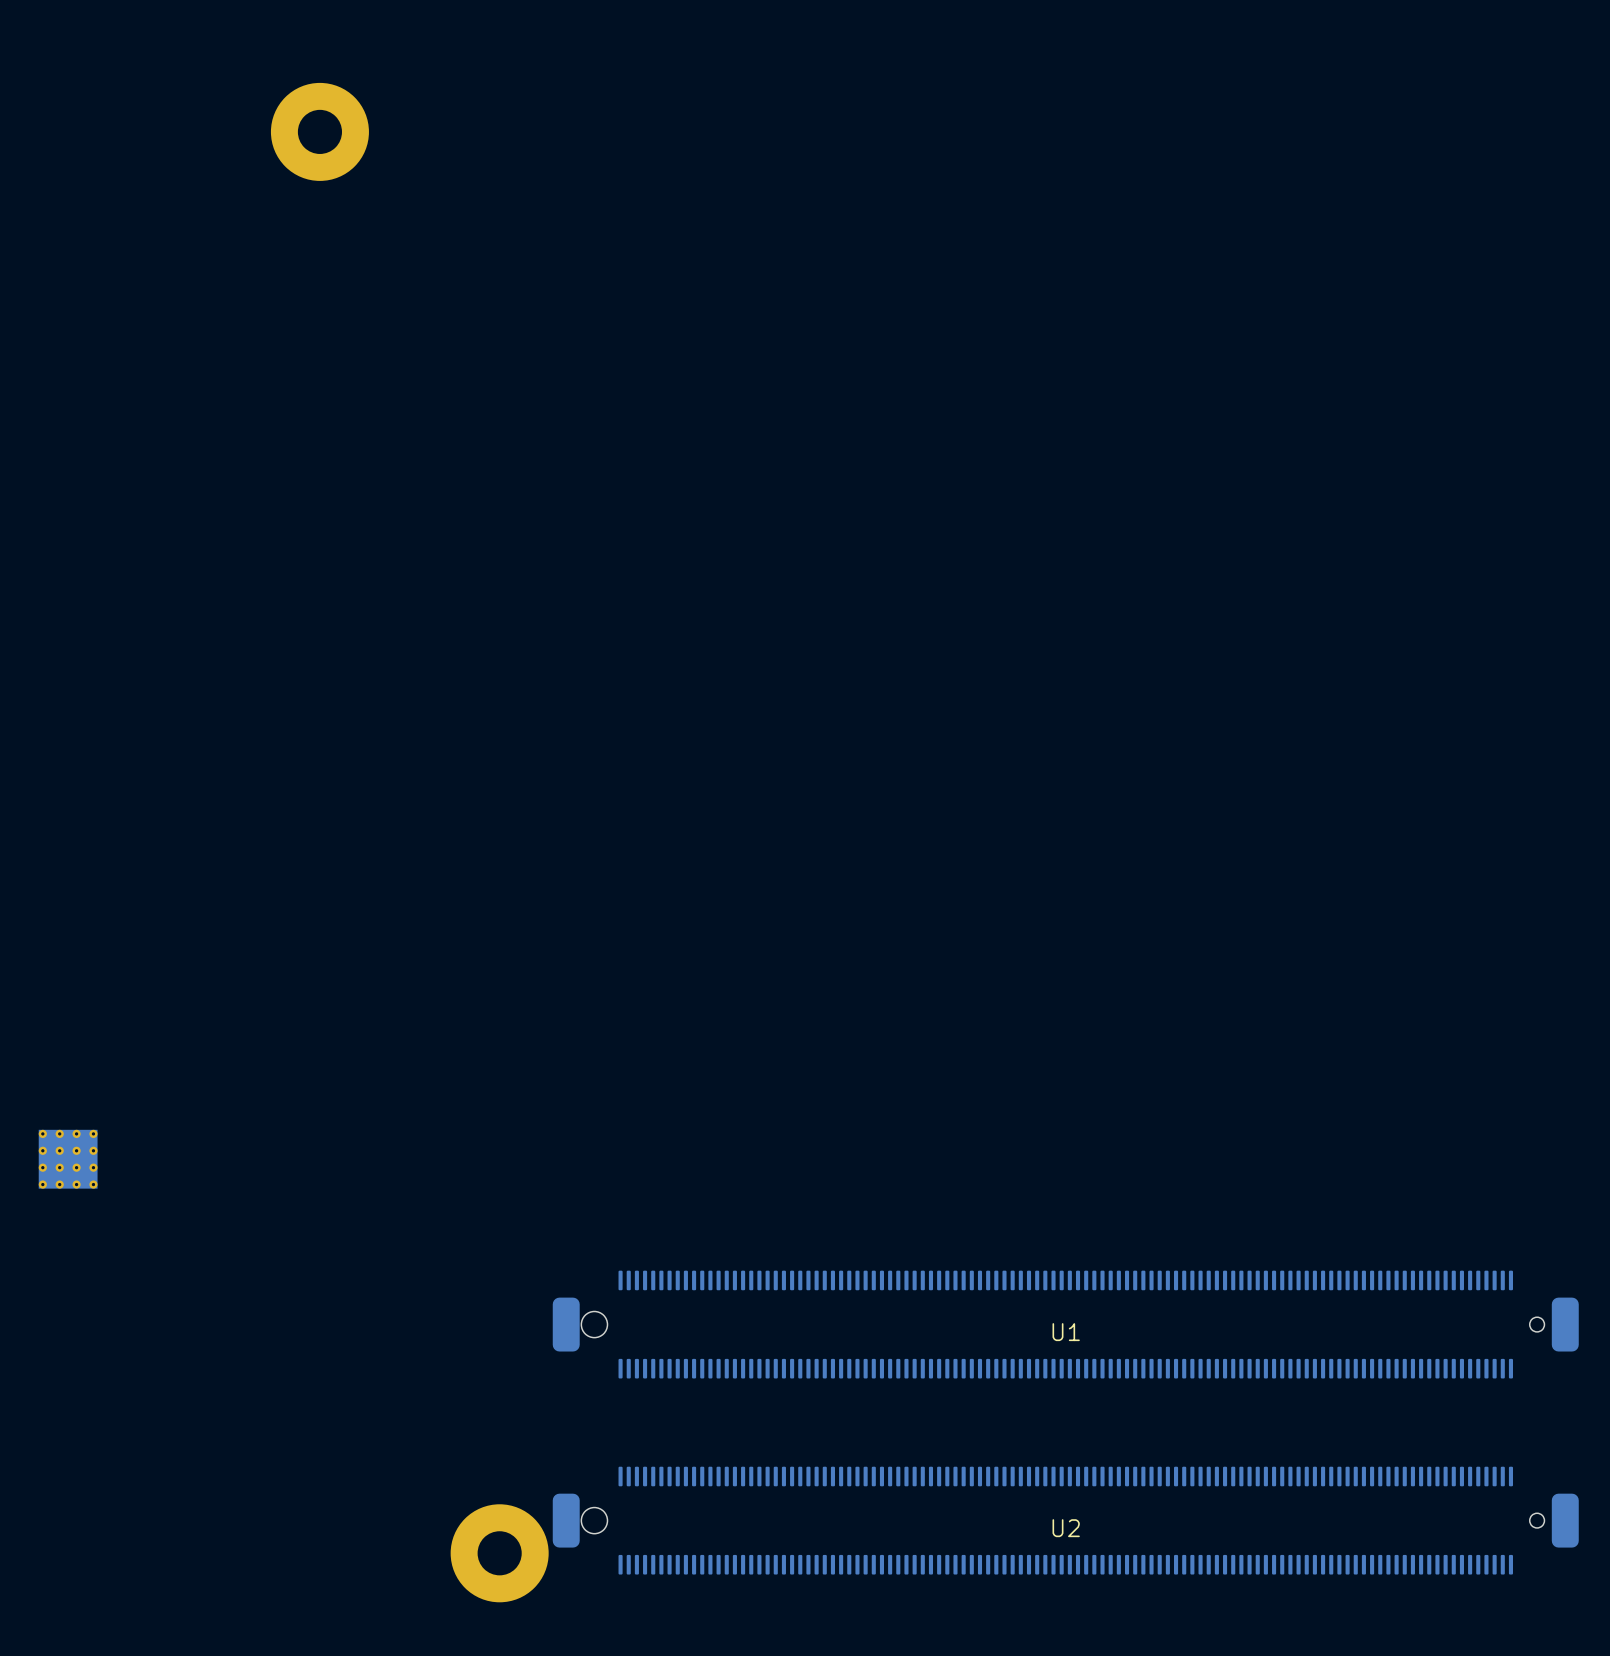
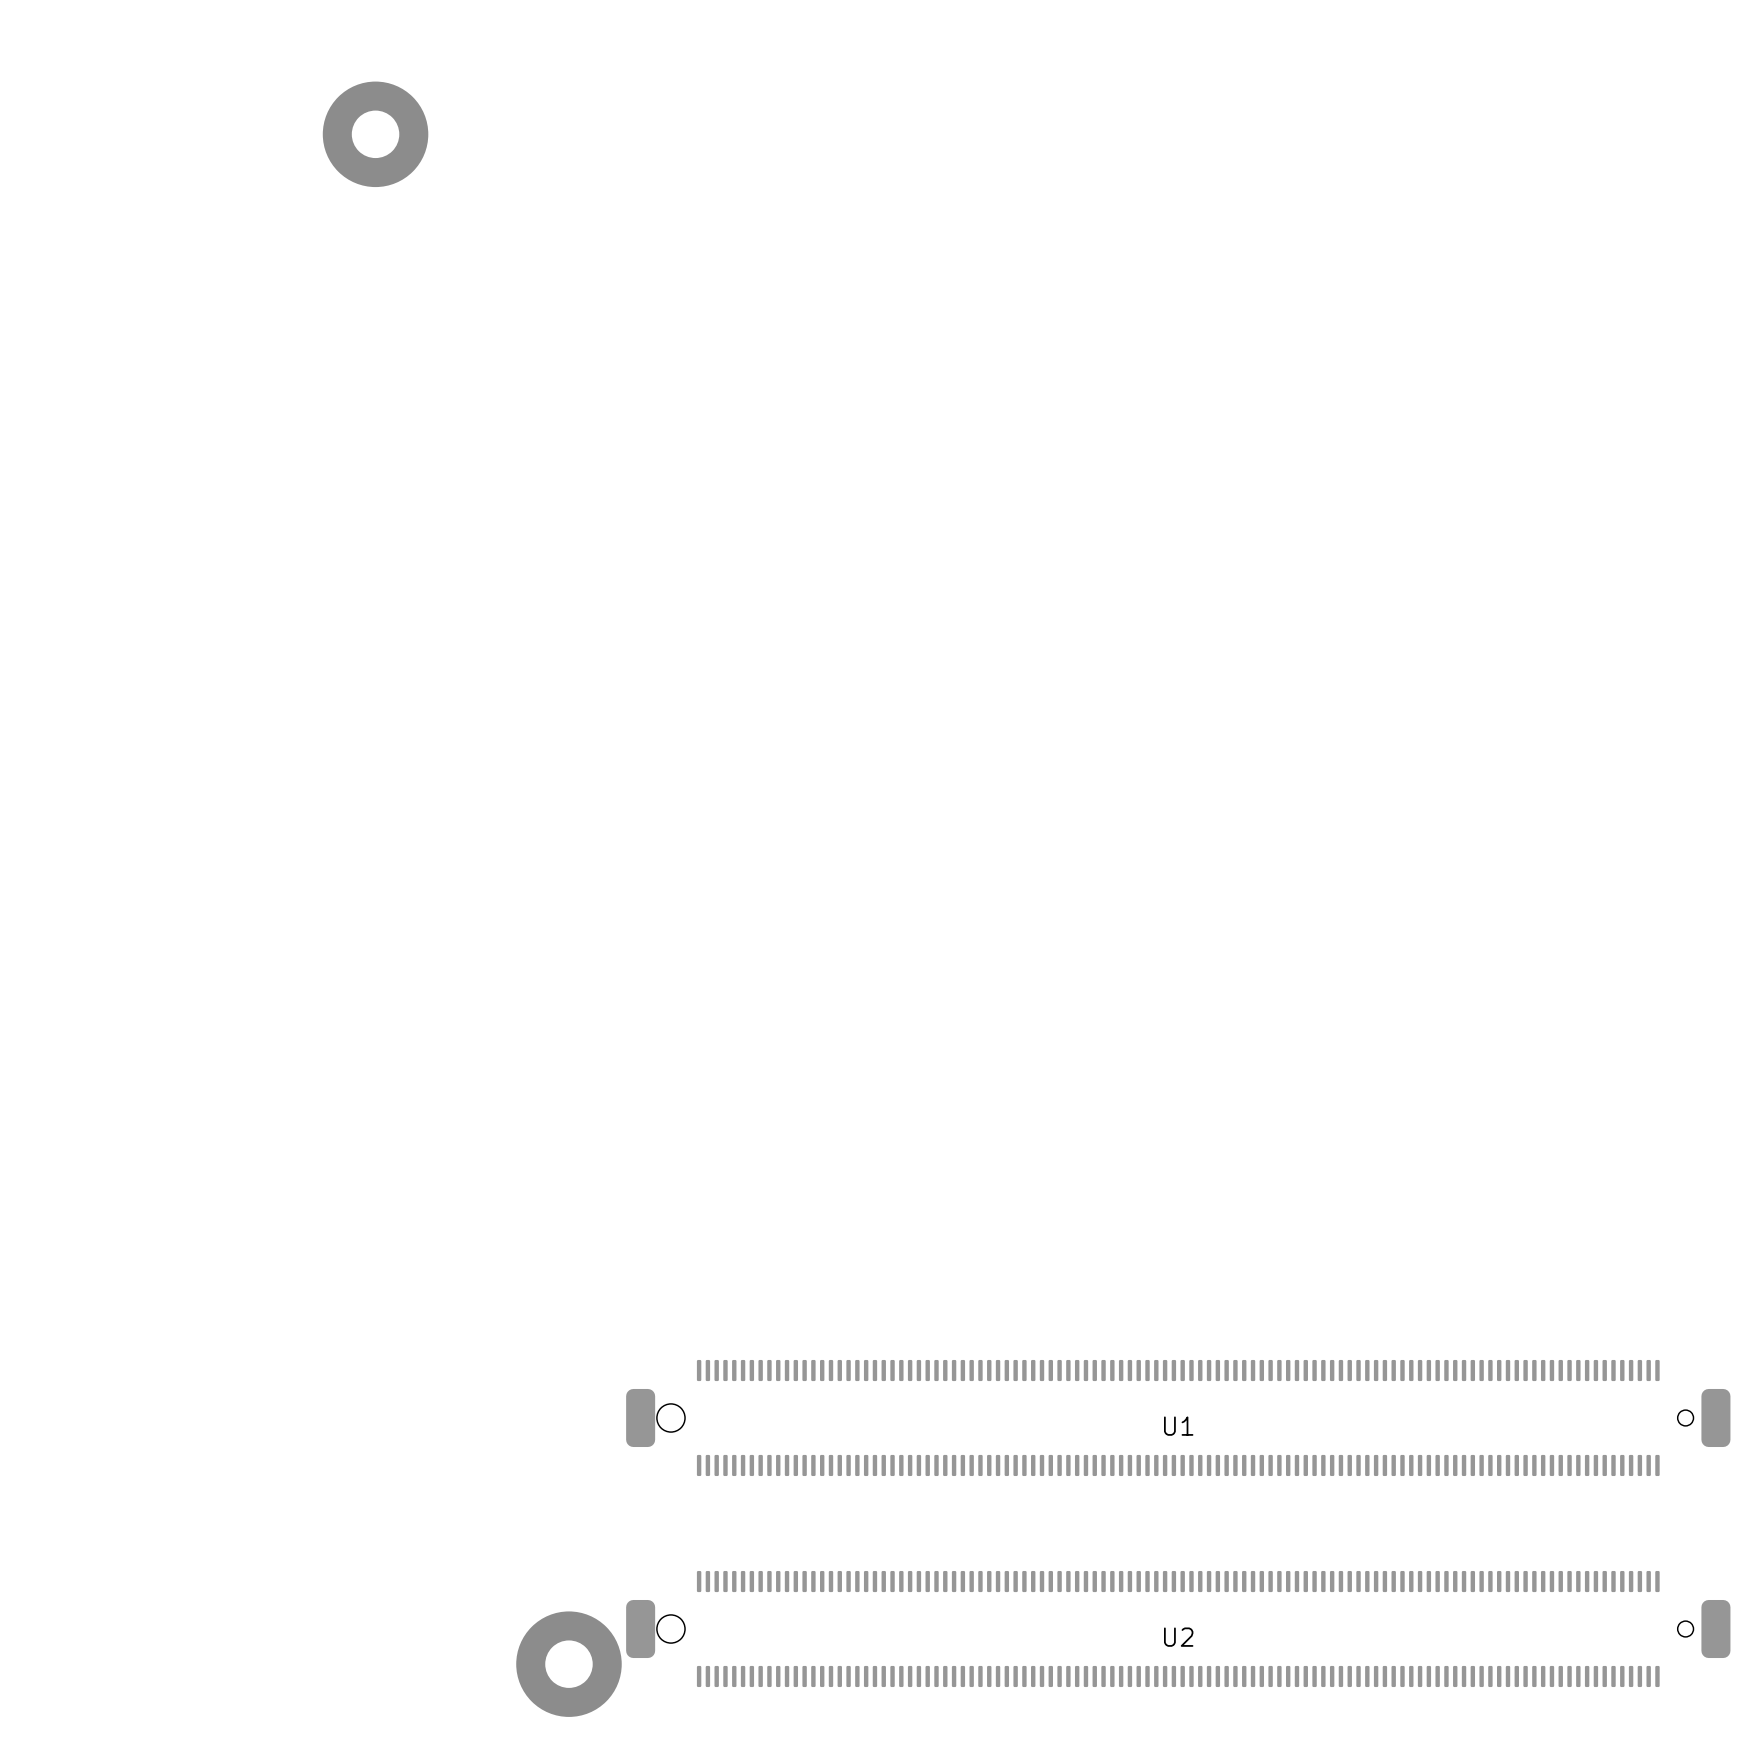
part: (68, 1159) -> none

